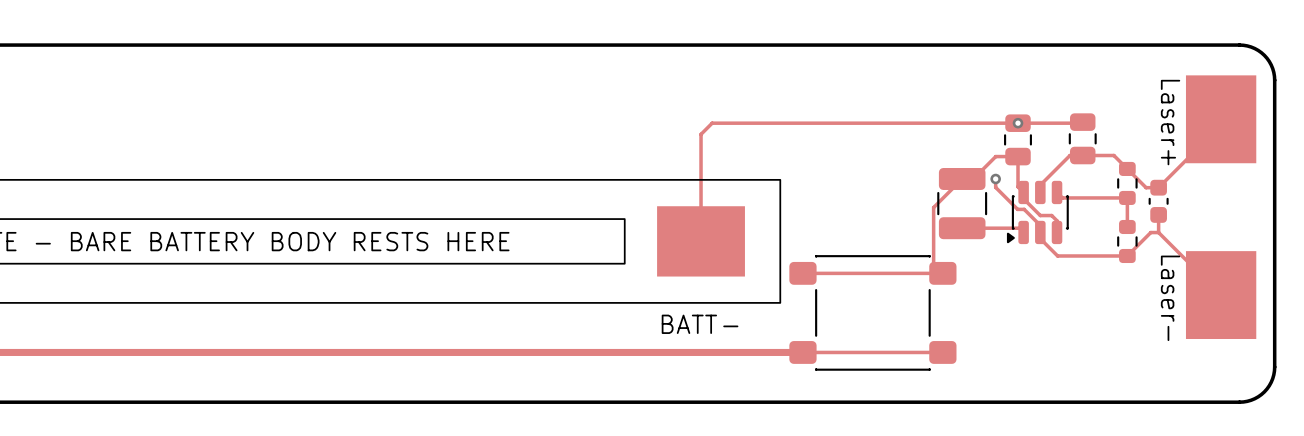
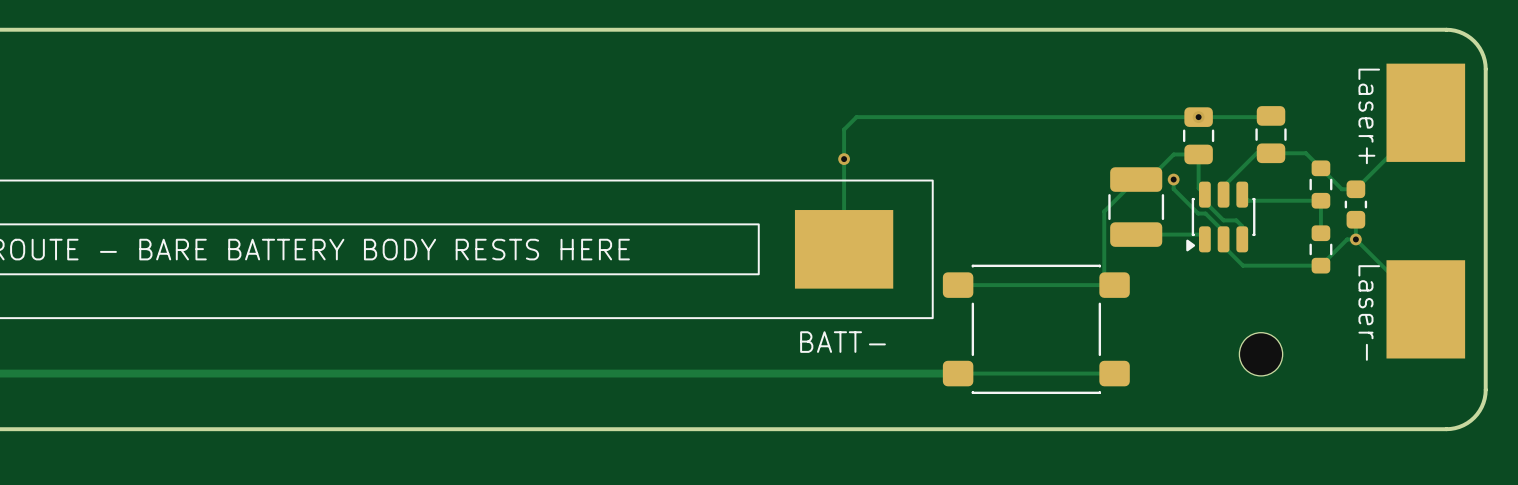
via: none -> (844, 159)
via: none -> (1355, 239)
part: none -> (1261, 354)

